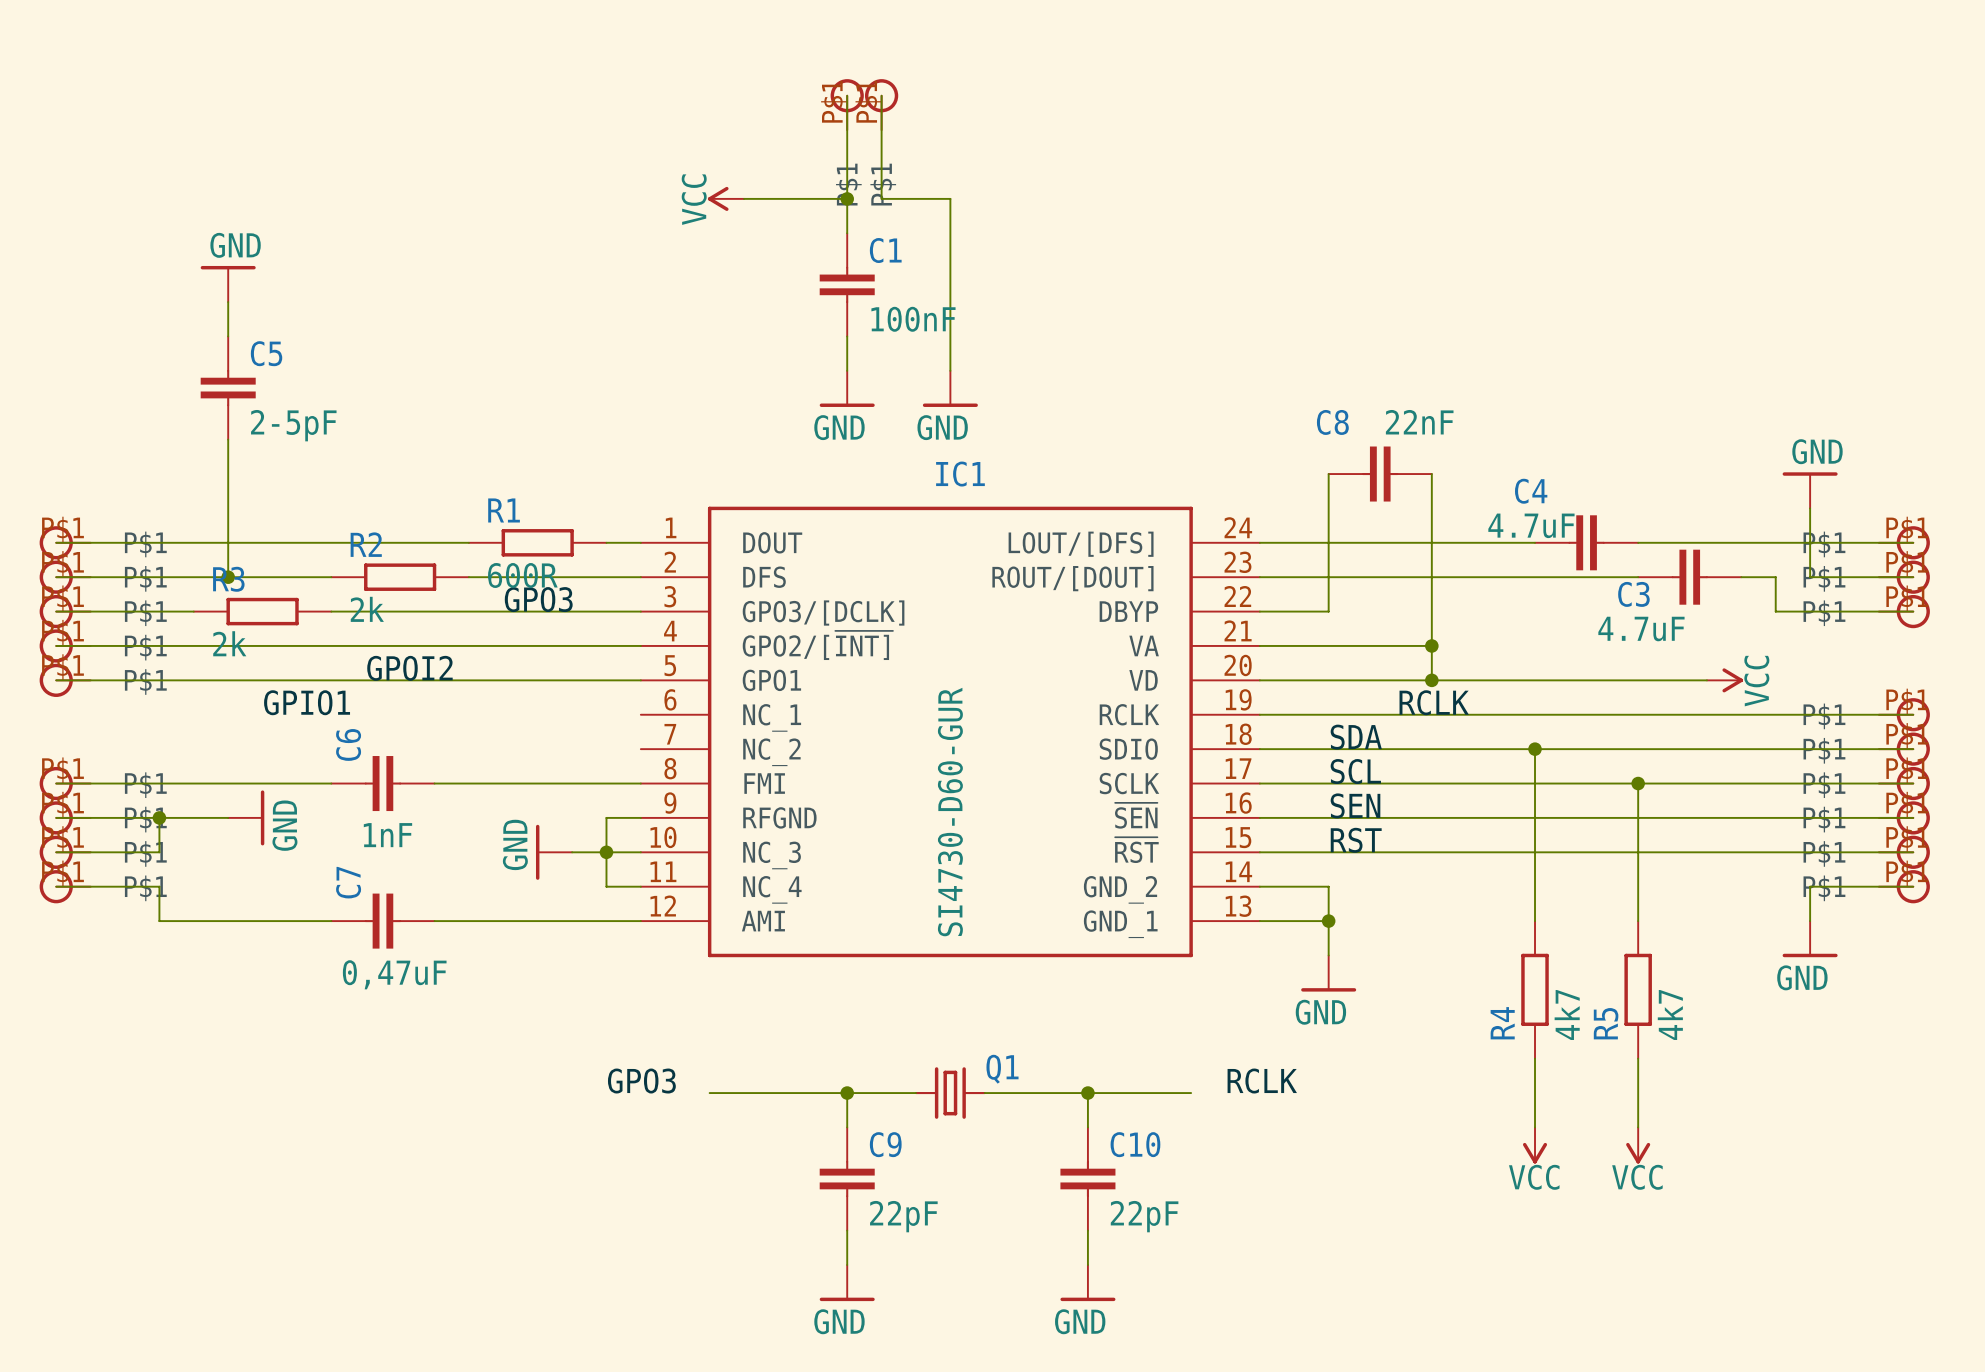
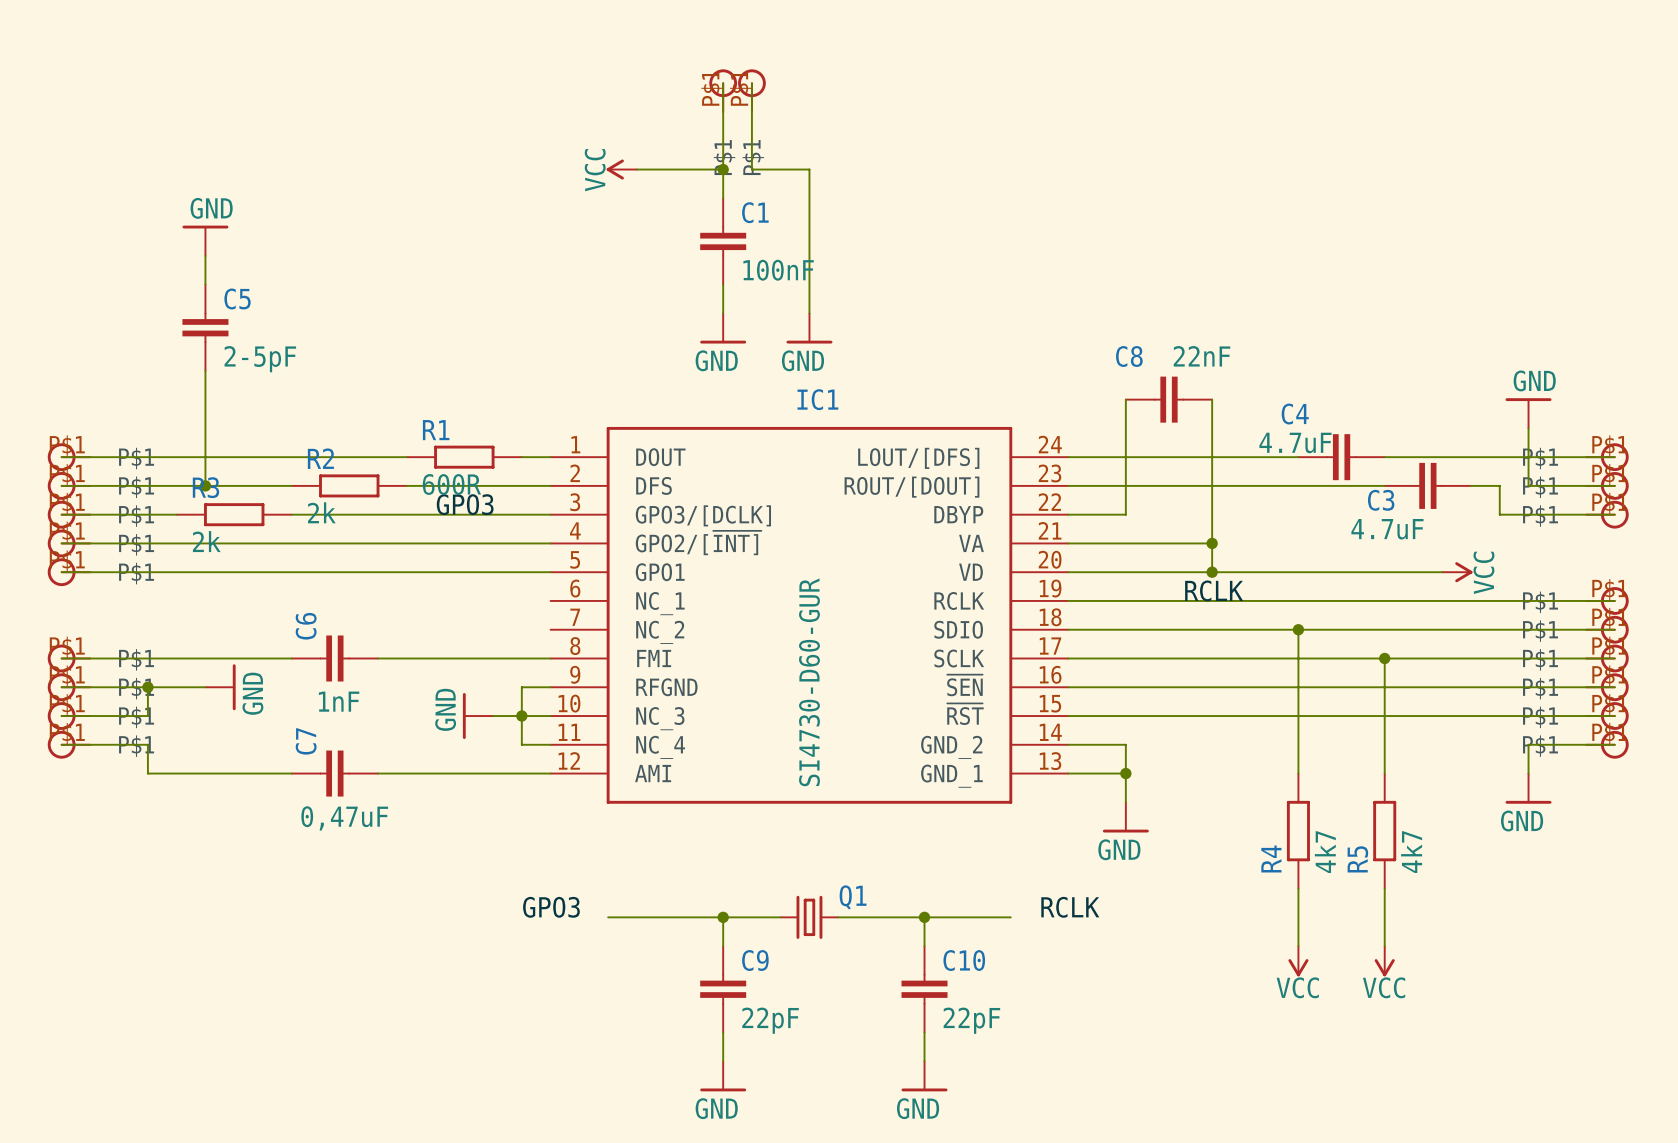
label: GPOI2 (409, 668) -> none
label: GPIO1 (307, 702) -> none
label: SDA (1356, 737) -> none
label: SCL (1355, 771) -> none
label: SEN (1355, 805) -> none
label: RST (1356, 840) -> none

